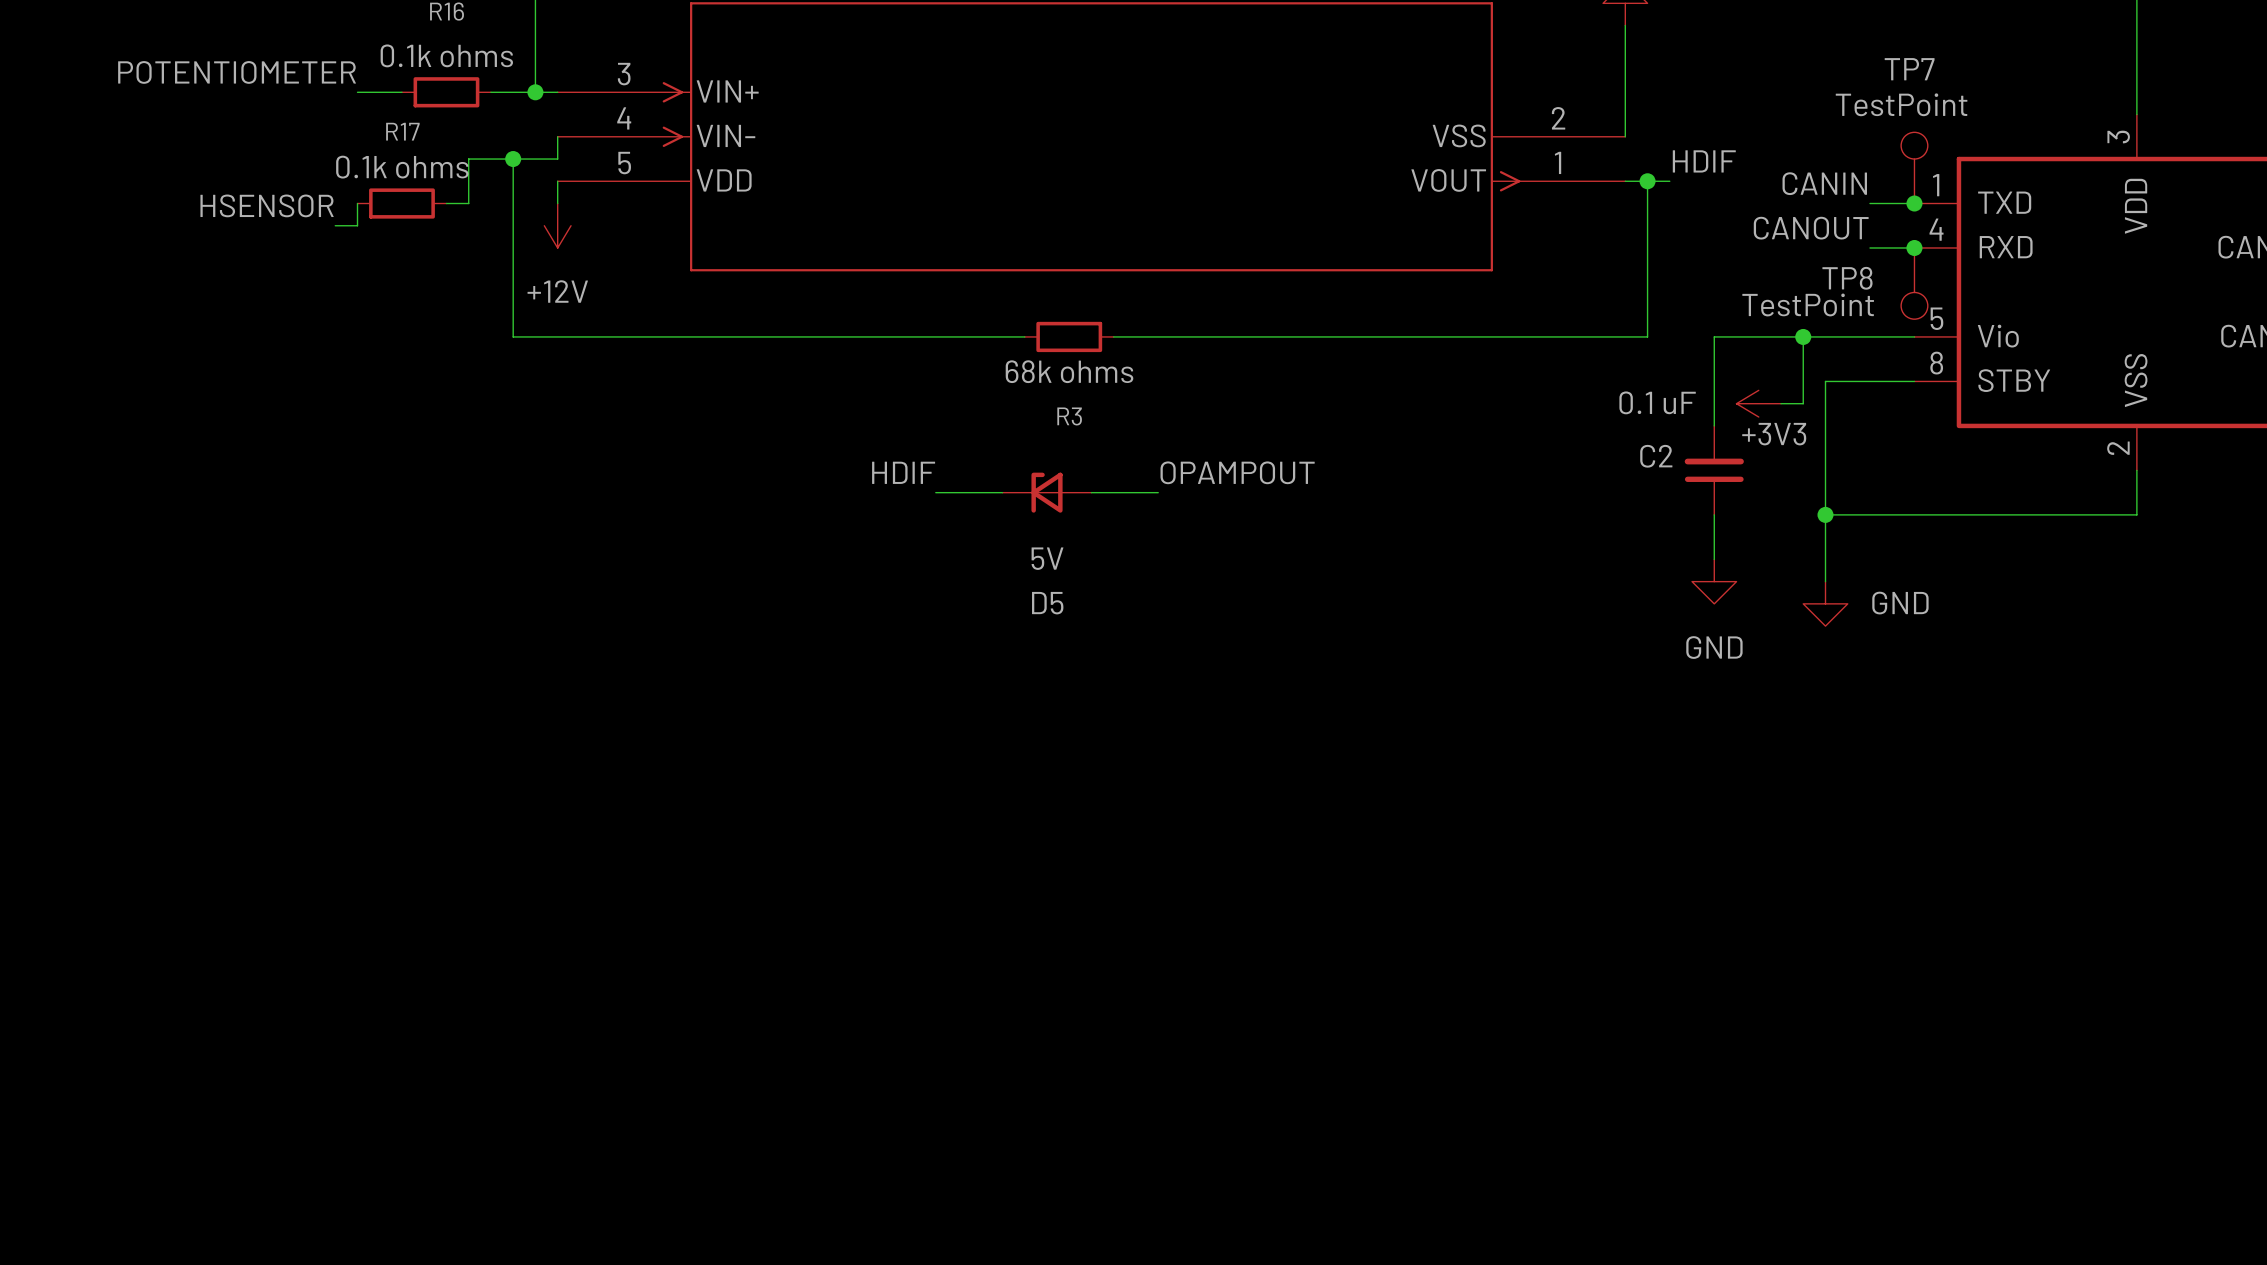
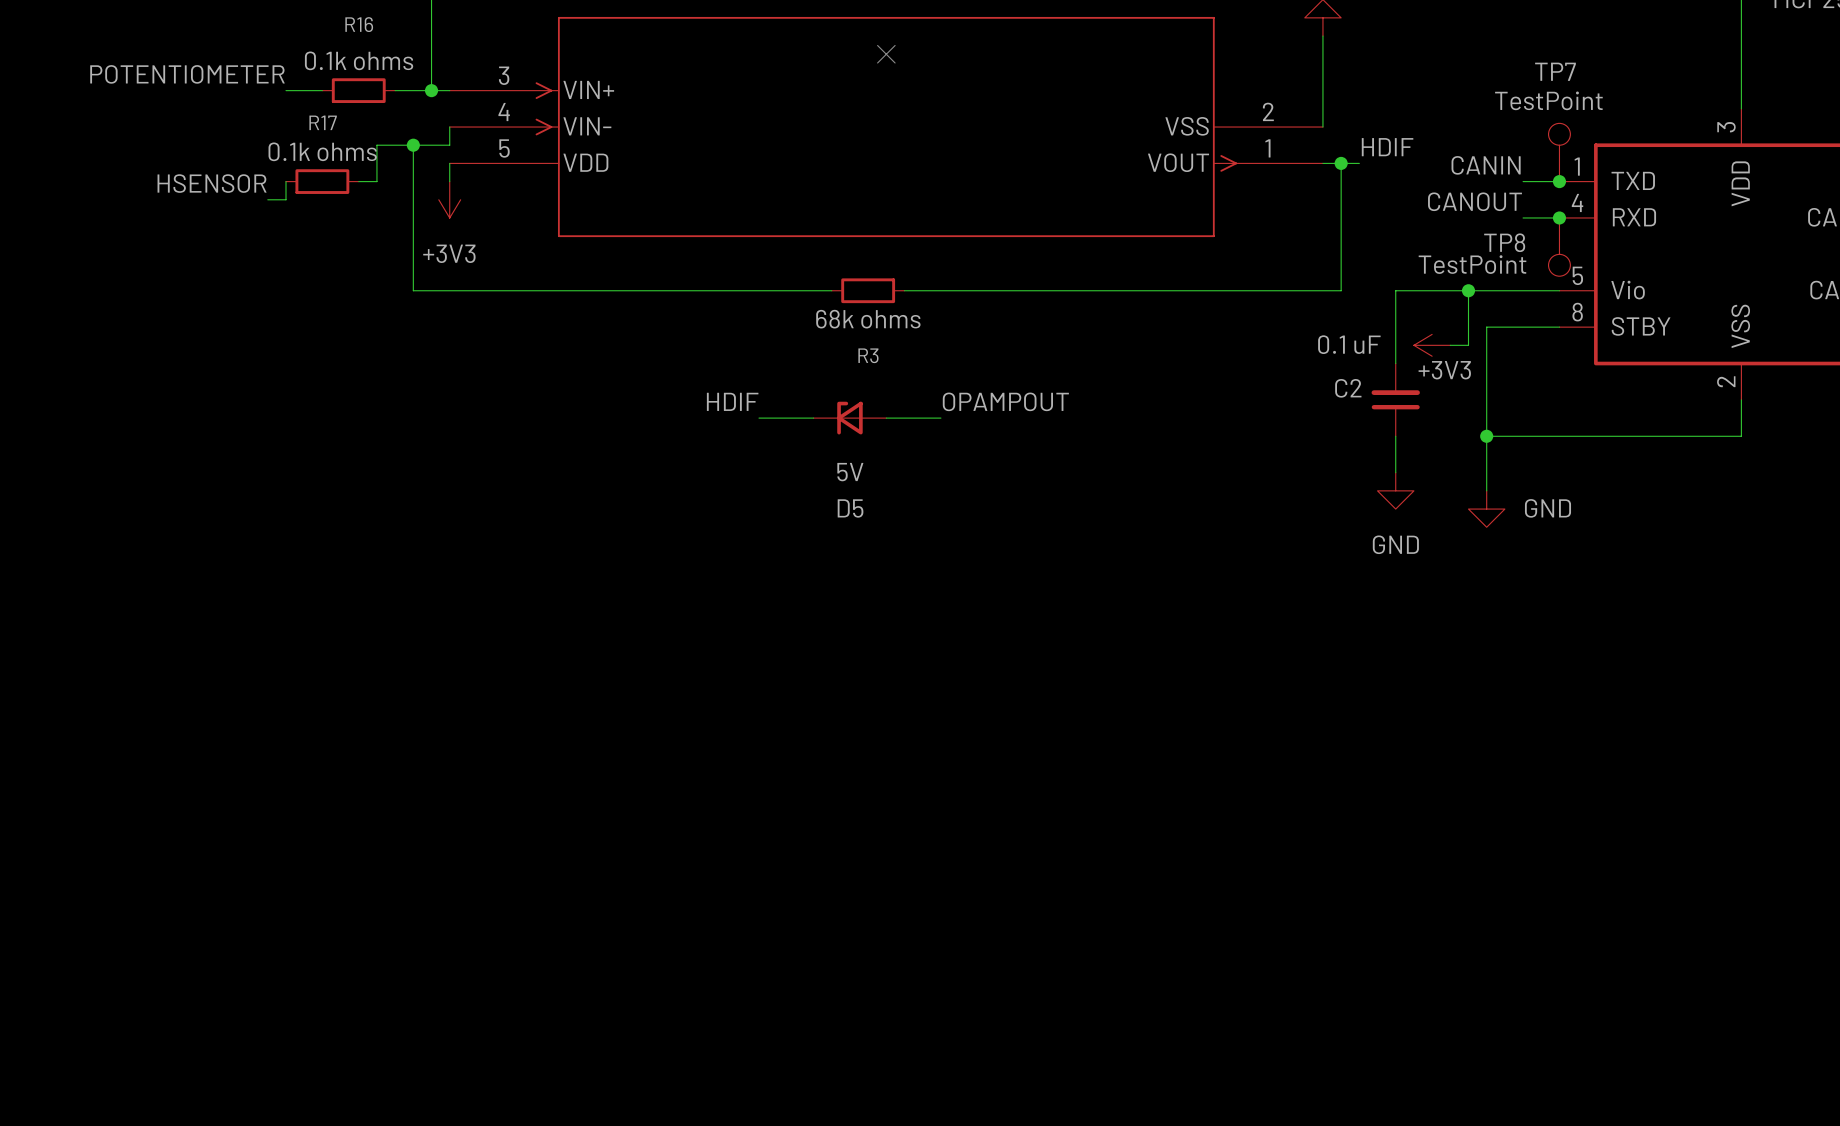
no-connect mark: none -> (886, 54)
power symbol: +12V (557, 225) -> +3V3 (449, 199)

